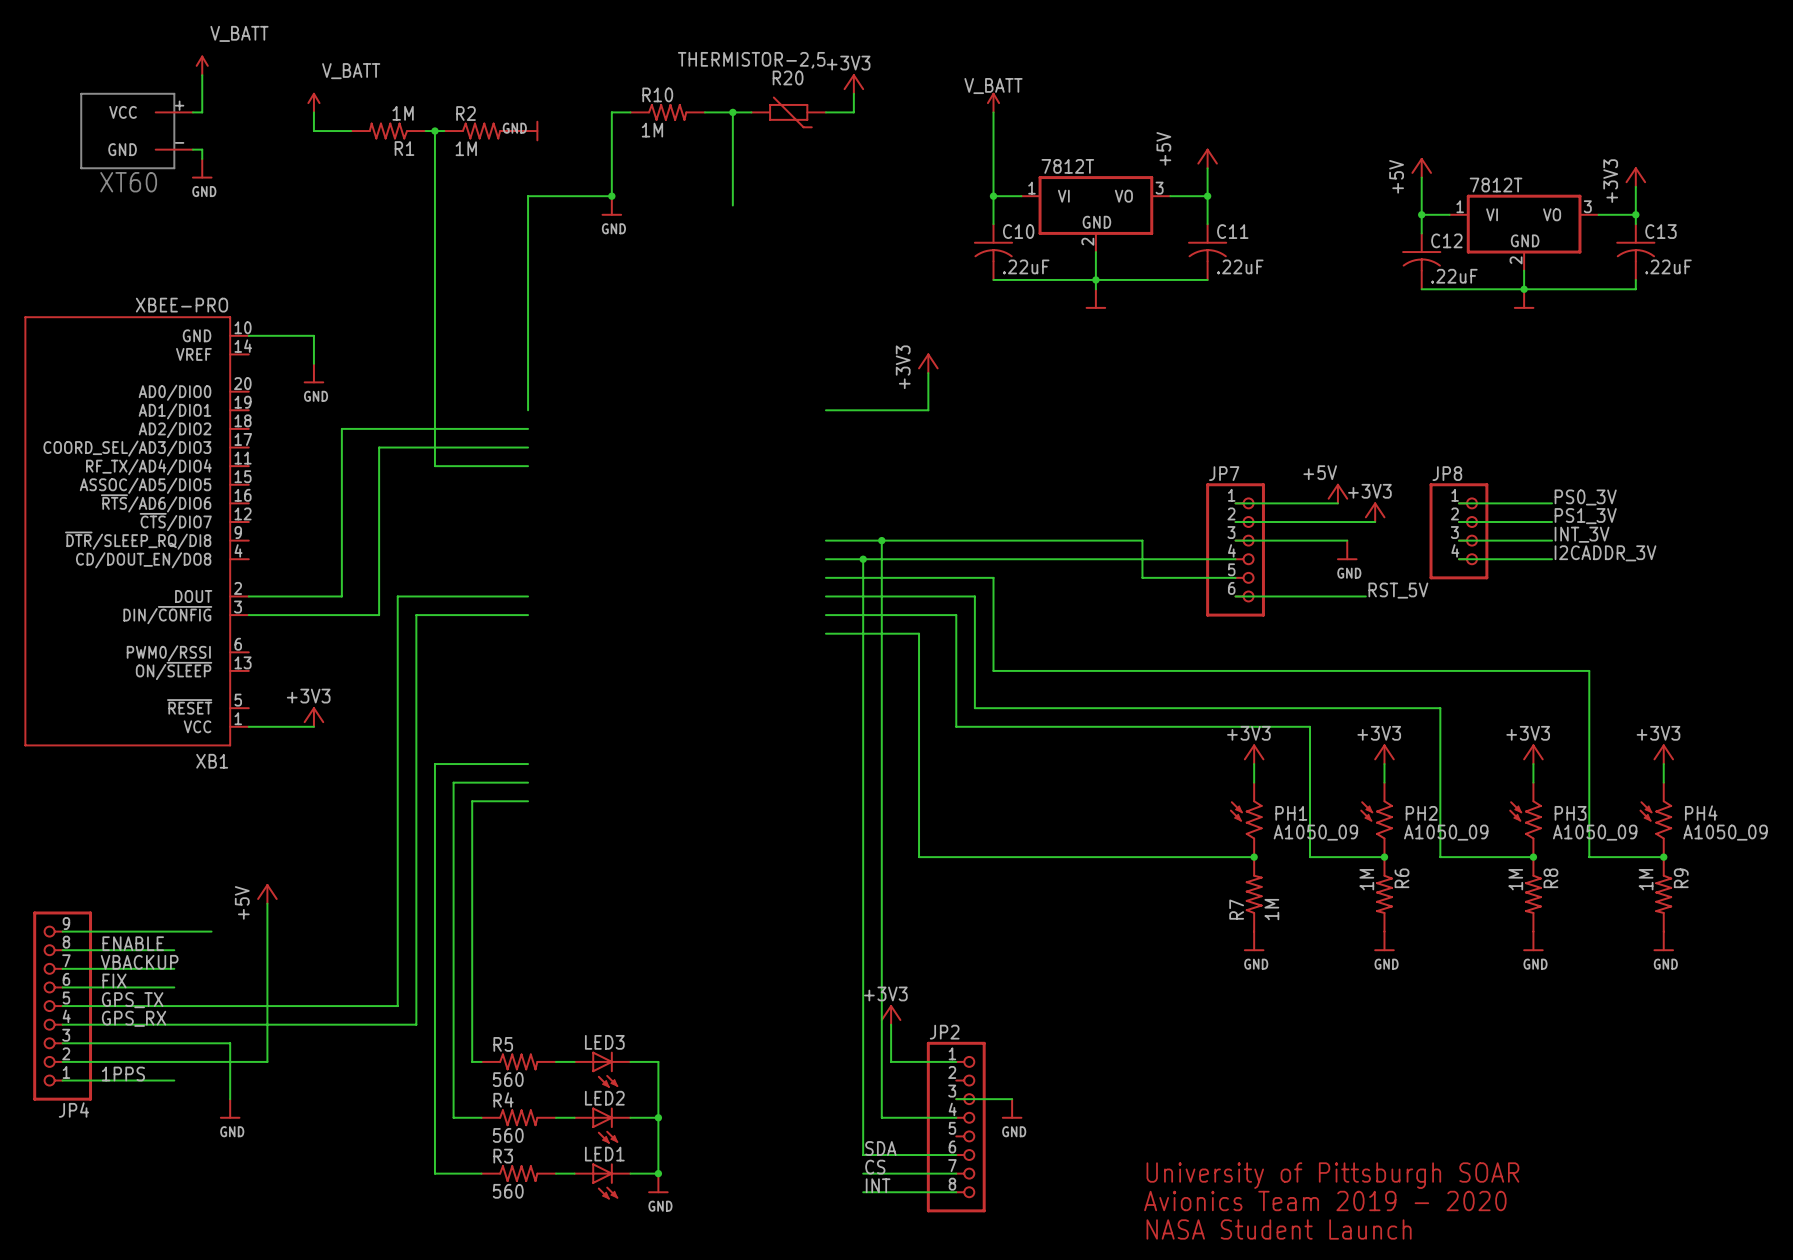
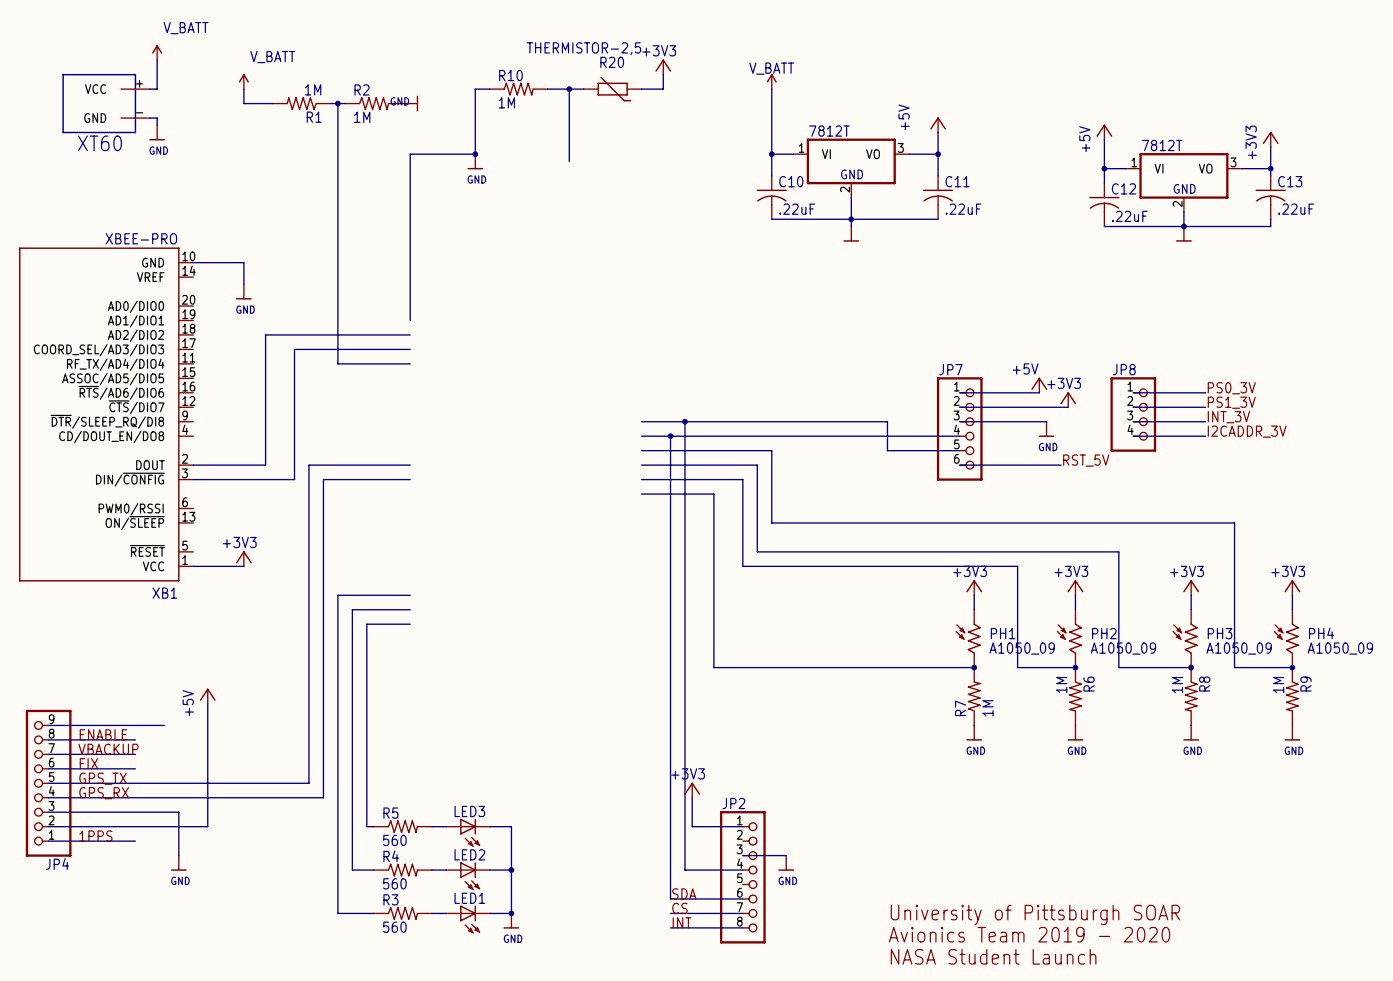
power symbol: +3V3 (928, 363) -> none
wire: (928, 373) (928, 410) (825, 410) -> none

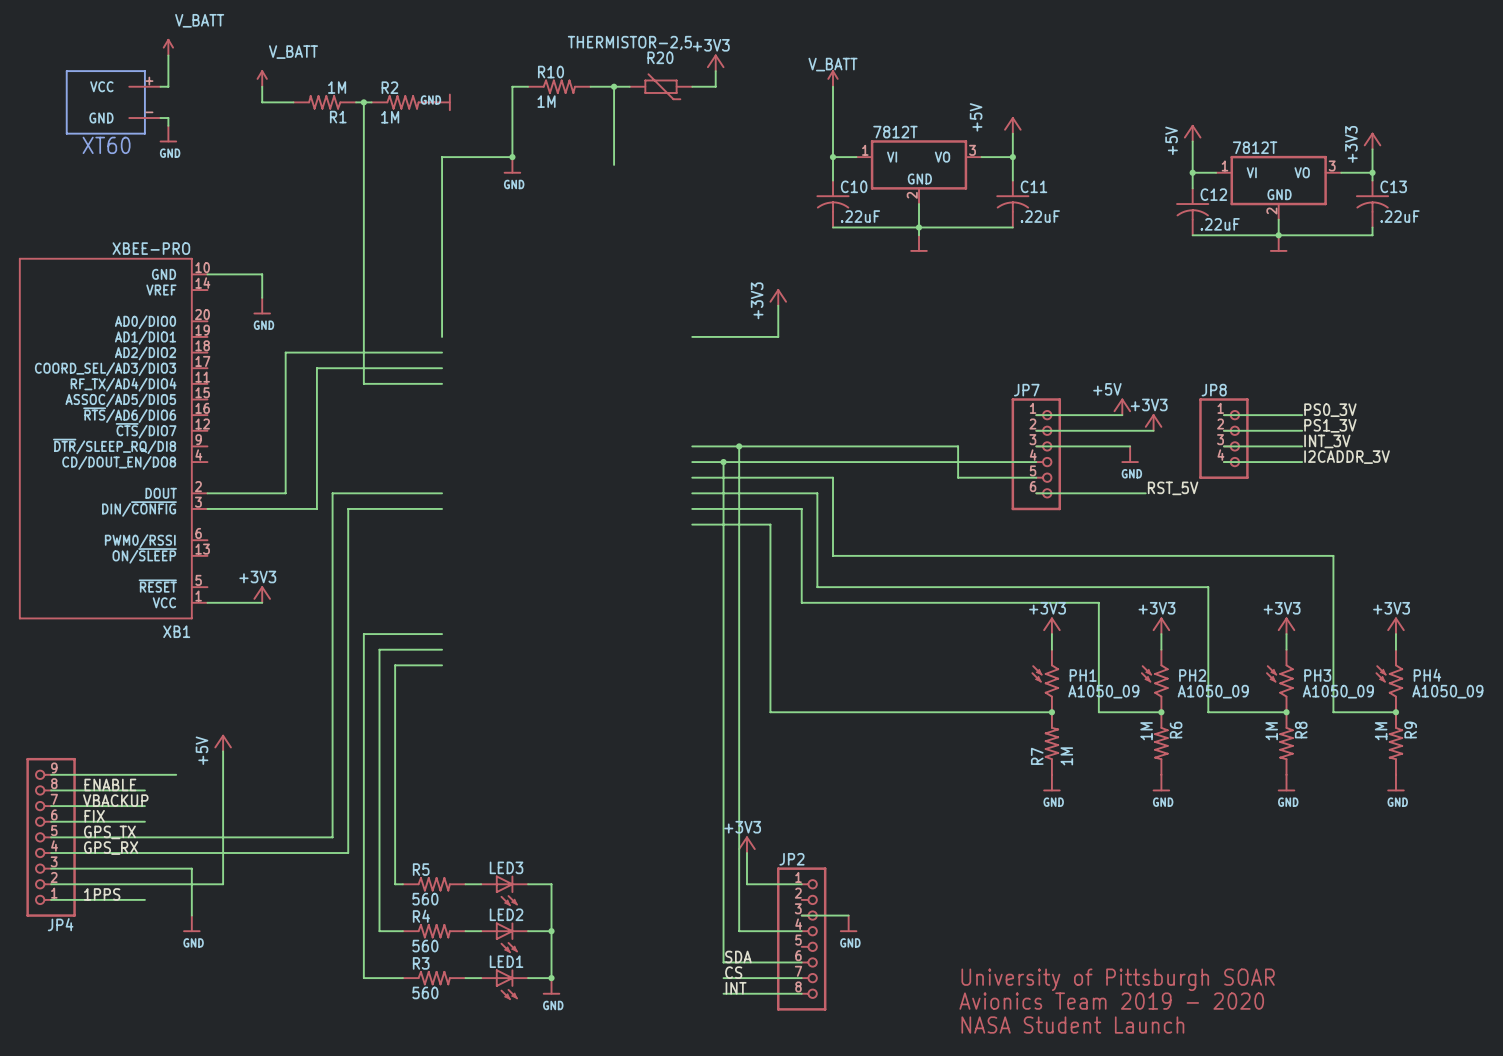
power symbol: none -> +3V3 (778, 297)
wire: none -> (778, 305) (778, 336) (692, 336)

